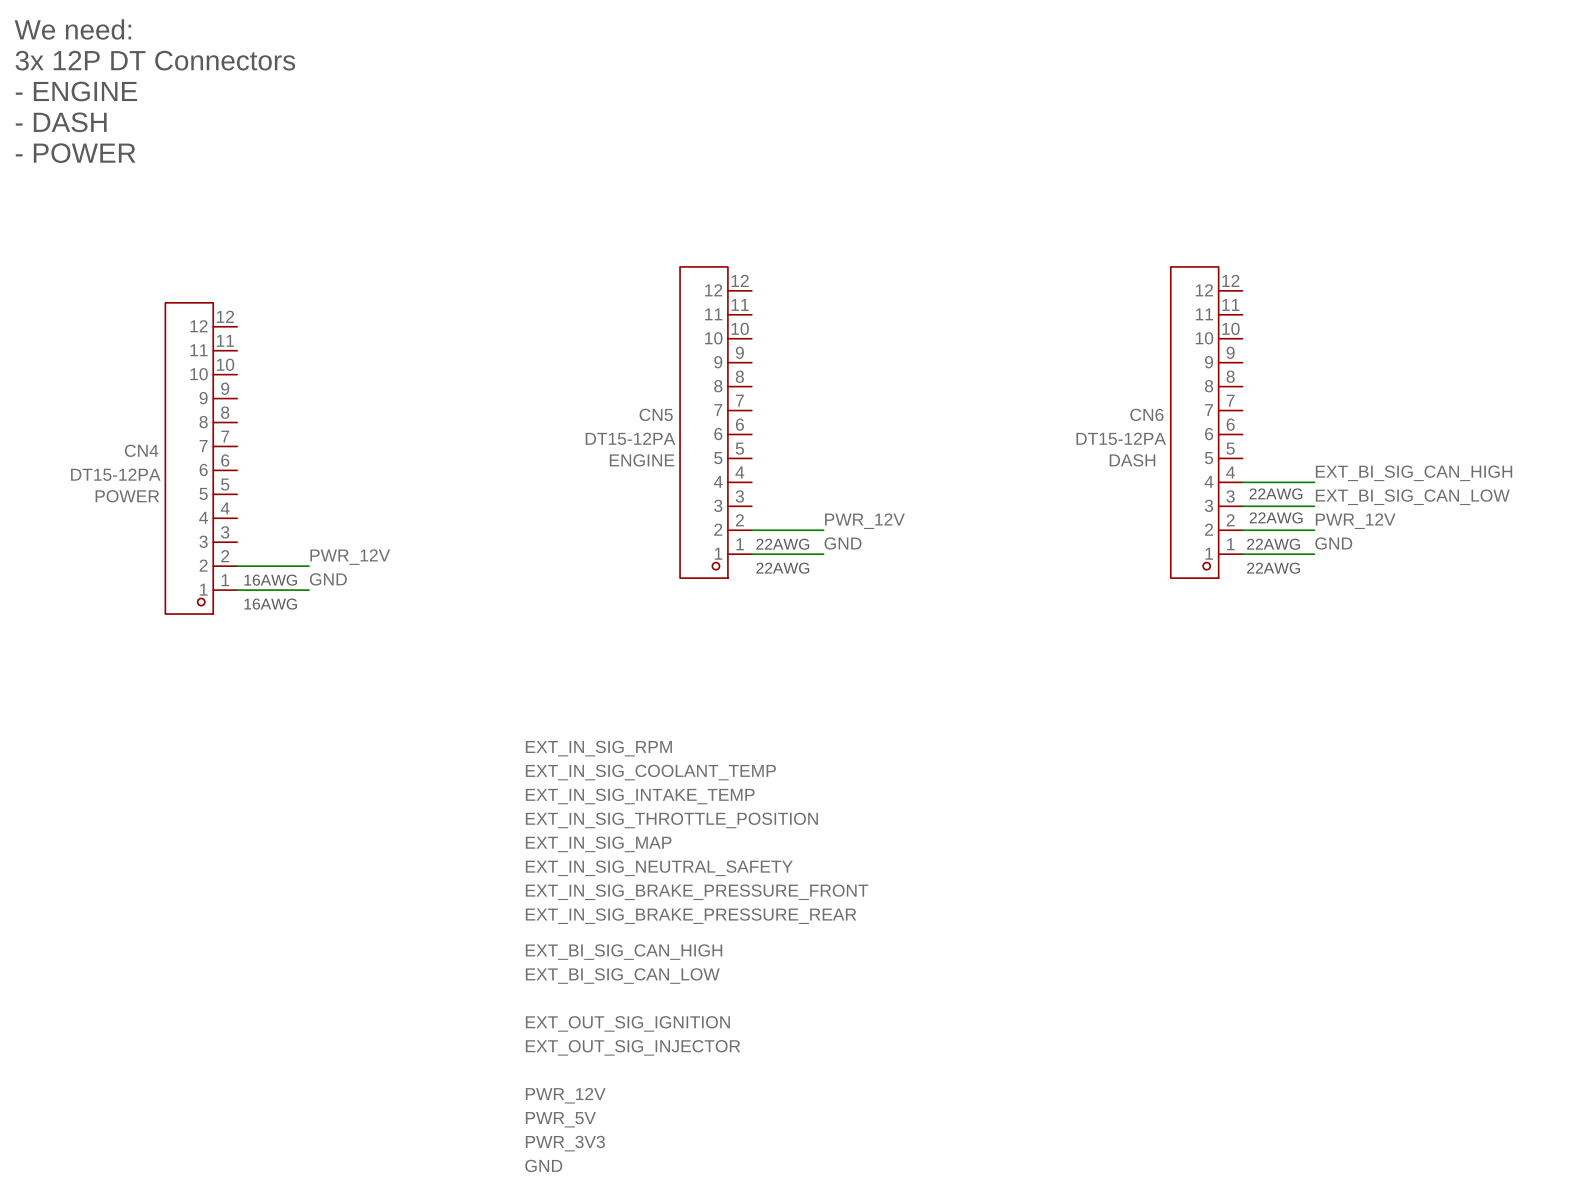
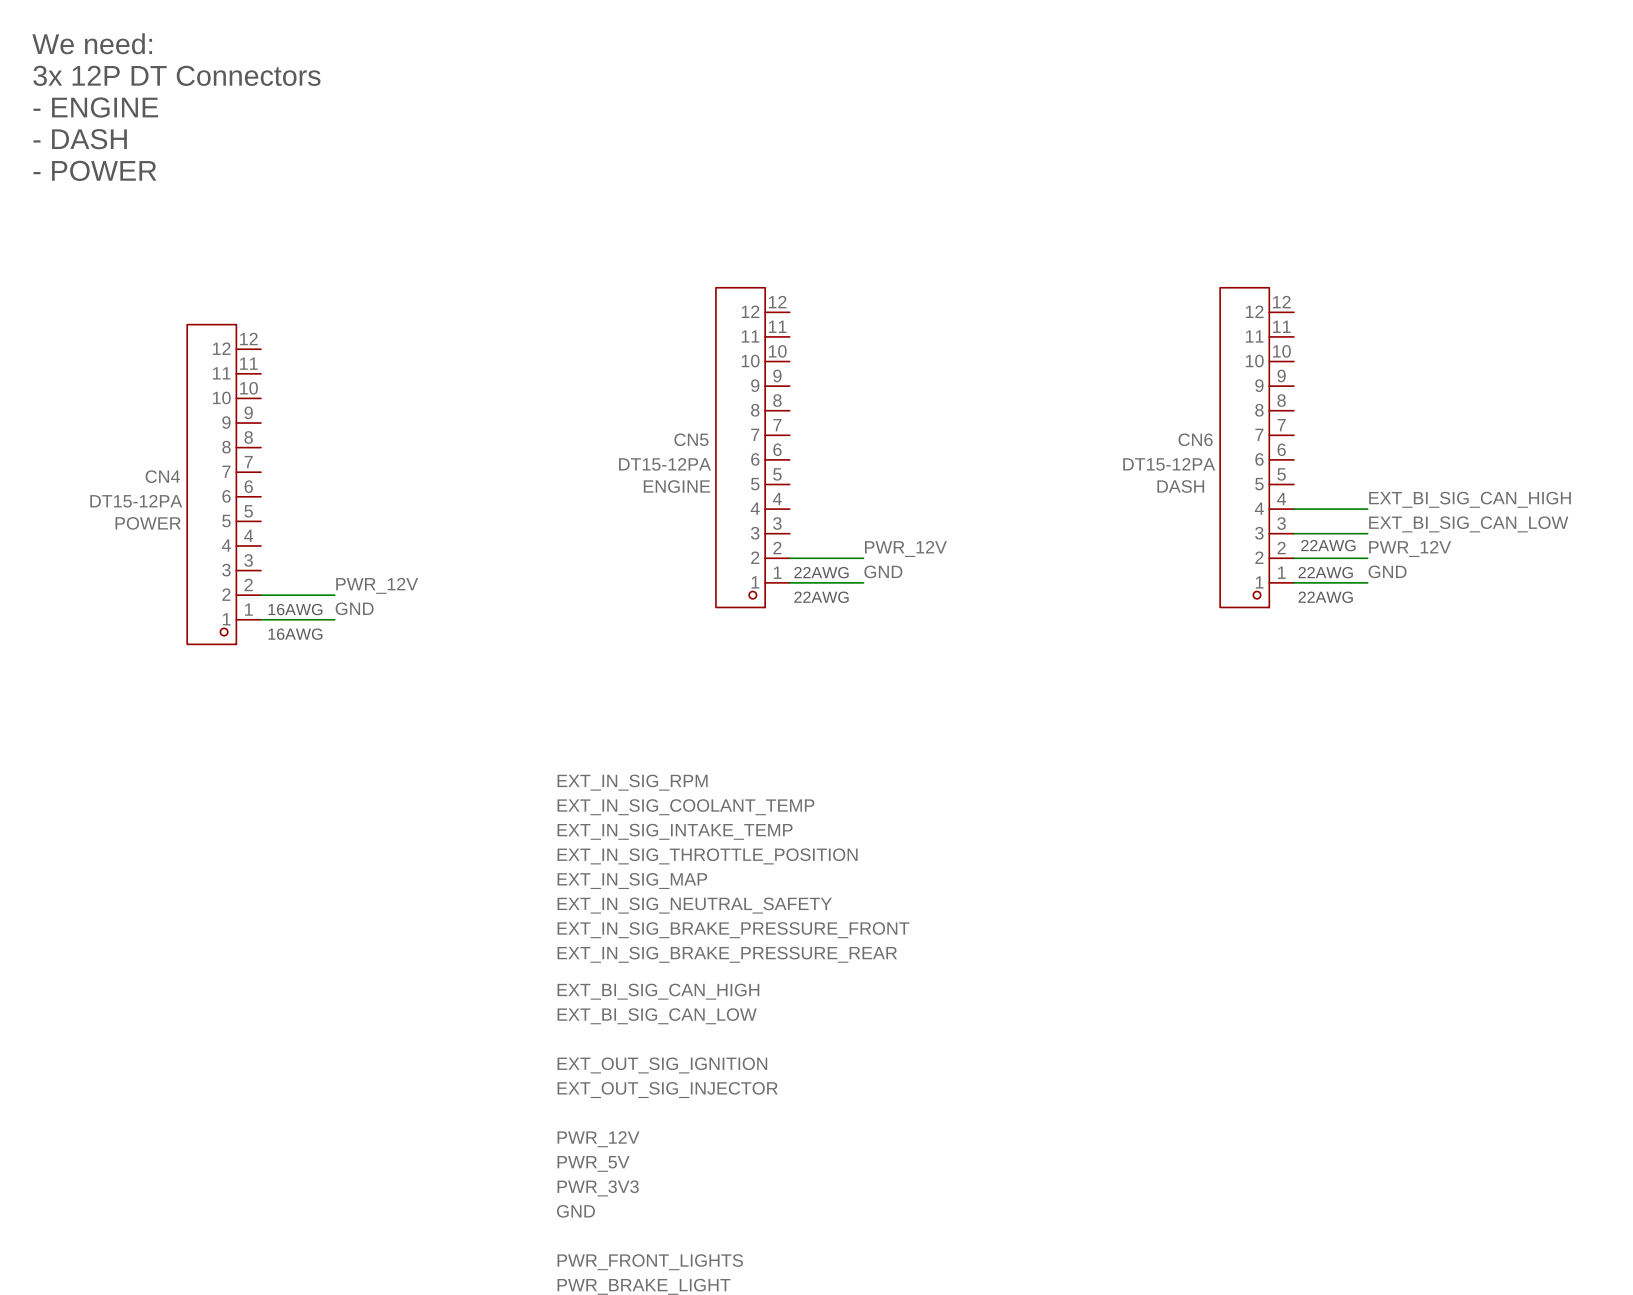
text: 22AWG (1275, 493) -> none

